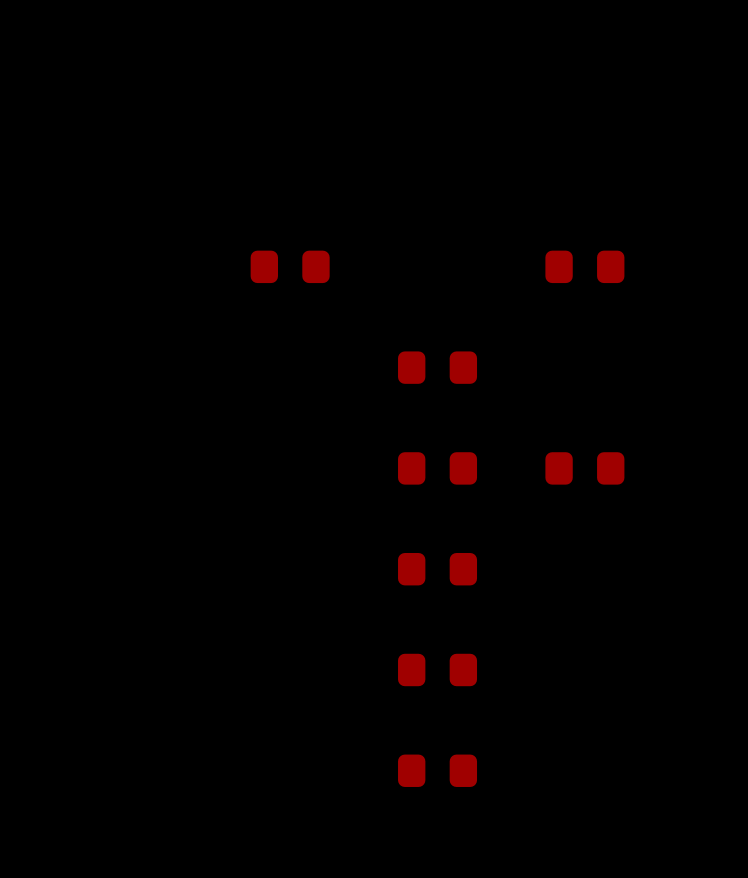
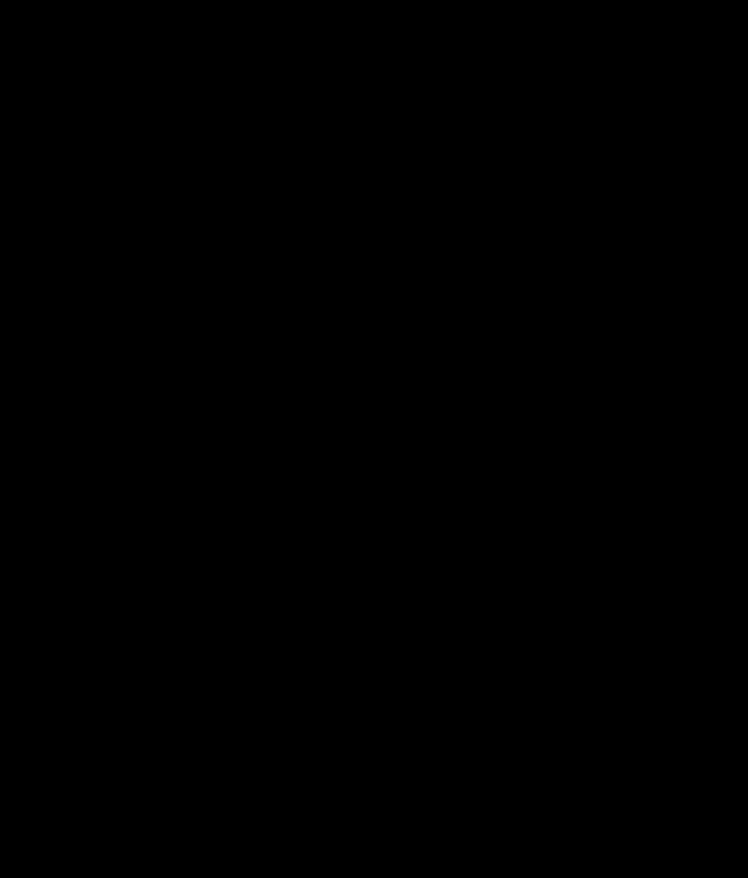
part: (290, 266) -> none
part: (584, 266) -> none
part: (437, 367) -> none
part: (437, 468) -> none
part: (584, 468) -> none
part: (437, 569) -> none
part: (437, 669) -> none
part: (437, 770) -> none

